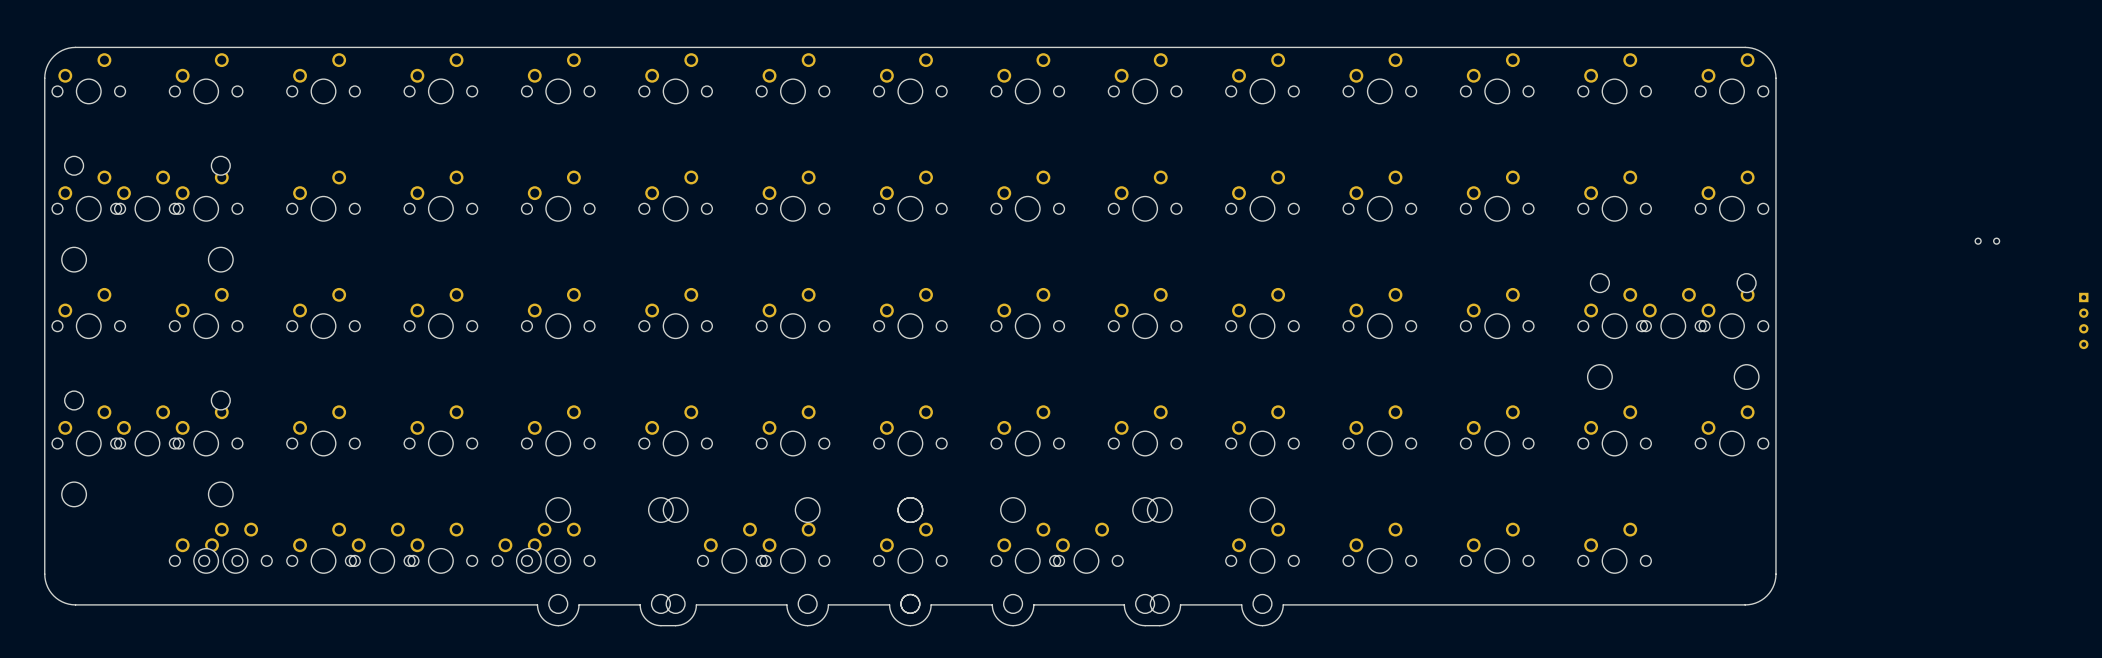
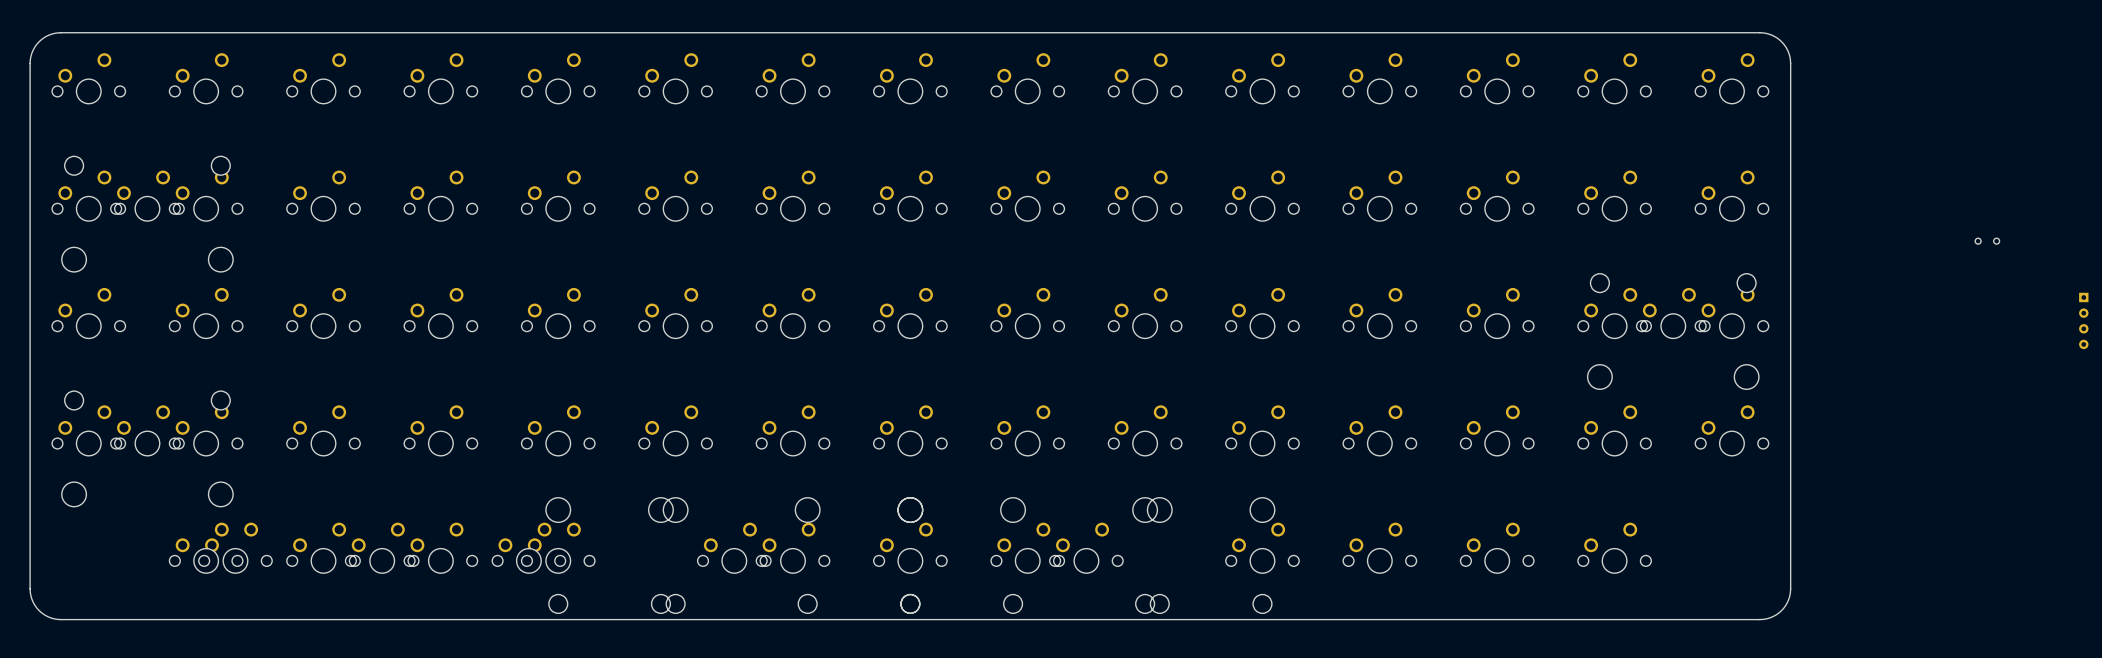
board edge: (75, 47) (1745, 47) (1755, 49) (1769, 59) (1774, 68) (1775, 78) (1775, 574) (1774, 584) (1764, 598) (1755, 603) (1745, 604) (1283, 604) (1281, 612) (1277, 619) (1270, 624) (1262, 625) (1255, 624) (1247, 619) (1242, 611) (1241, 604) (1180, 604) (1177, 615) (1170, 622) (1162, 625) (1145, 625) (1138, 624) (1130, 619) (1126, 613) (1124, 604) (1033, 604) (1032, 612) (1027, 619) (1021, 624) (1013, 625) (1006, 624) (998, 619) (994, 613) (992, 604) (931, 604) (929, 612) (925, 619) (918, 624) (910, 625) (903, 624) (895, 619) (891, 613) (889, 604) (828, 604) (826, 612) (822, 619) (815, 624) (807, 625) (800, 624) (793, 619) (788, 613) (786, 604) (696, 604) (693, 615) (686, 622) (678, 625) (660, 625) (651, 623) (646, 619) (641, 611) (640, 604) (579, 604) (577, 612) (572, 619) (566, 624) (558, 625) (551, 624) (543, 619) (539, 613) (537, 604) (75, 604) (65, 603) (56, 598) (49, 590) (44, 574) (44, 78) (46, 68) (53, 56) (62, 50) (75, 47) -> (60, 32) (50, 34) (39, 41) (33, 50) (30, 63) (30, 588) (31, 598) (36, 607) (50, 617) (60, 619) (1759, 619) (1776, 614) (1783, 607) (1788, 598) (1790, 588) (1790, 63) (1788, 53) (1783, 44) (1770, 34) (1759, 32) (60, 32)

